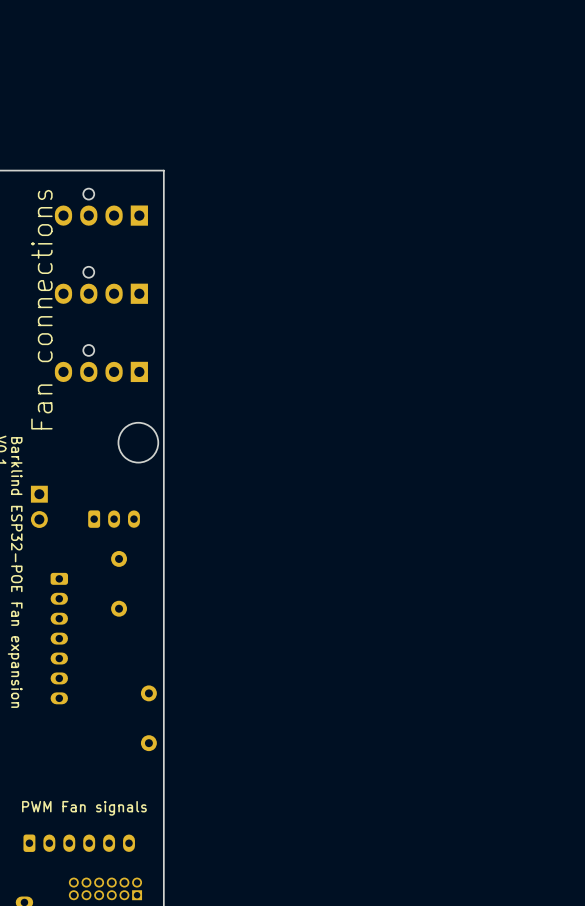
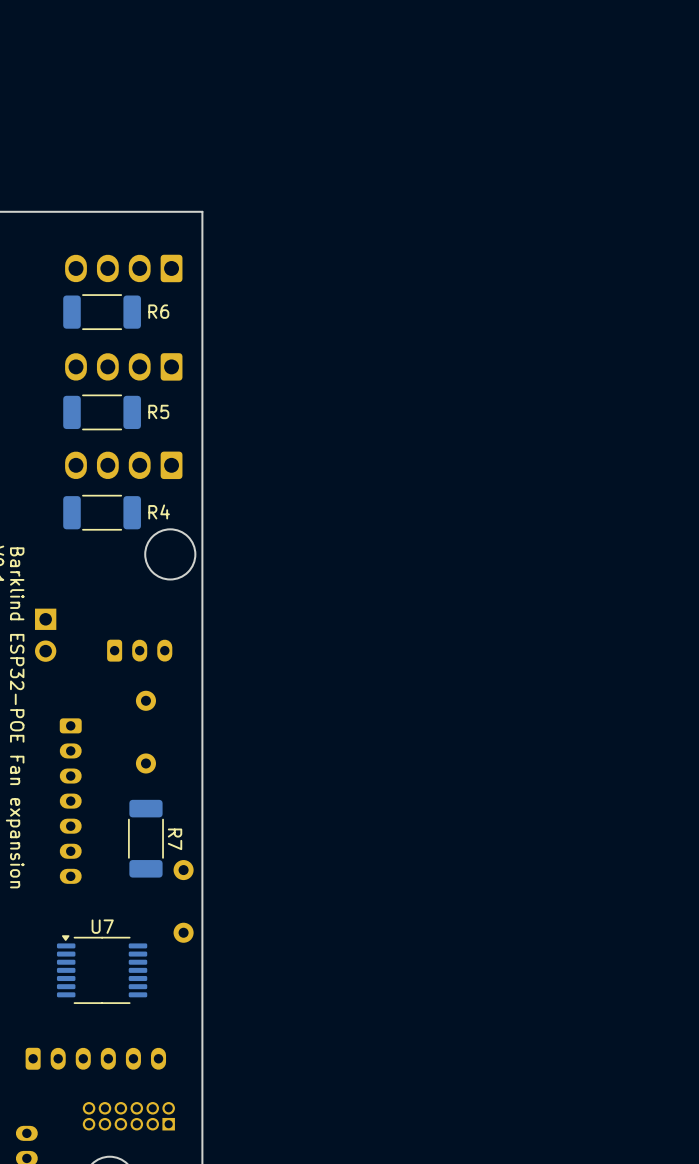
part footprint: [54, 188, 148, 226] -> [65, 254, 183, 283]
R6: none -> (102, 312)
part footprint: [54, 266, 148, 304] -> [65, 353, 183, 381]
text: Fan connections (41, 309) -> none
R5: none -> (102, 412)
part footprint: [54, 344, 148, 383] -> [65, 451, 183, 480]
R4: none -> (102, 512)
R7: none -> (145, 838)
U7: none -> (102, 969)
text: PWM Fan signals (84, 808) -> none

